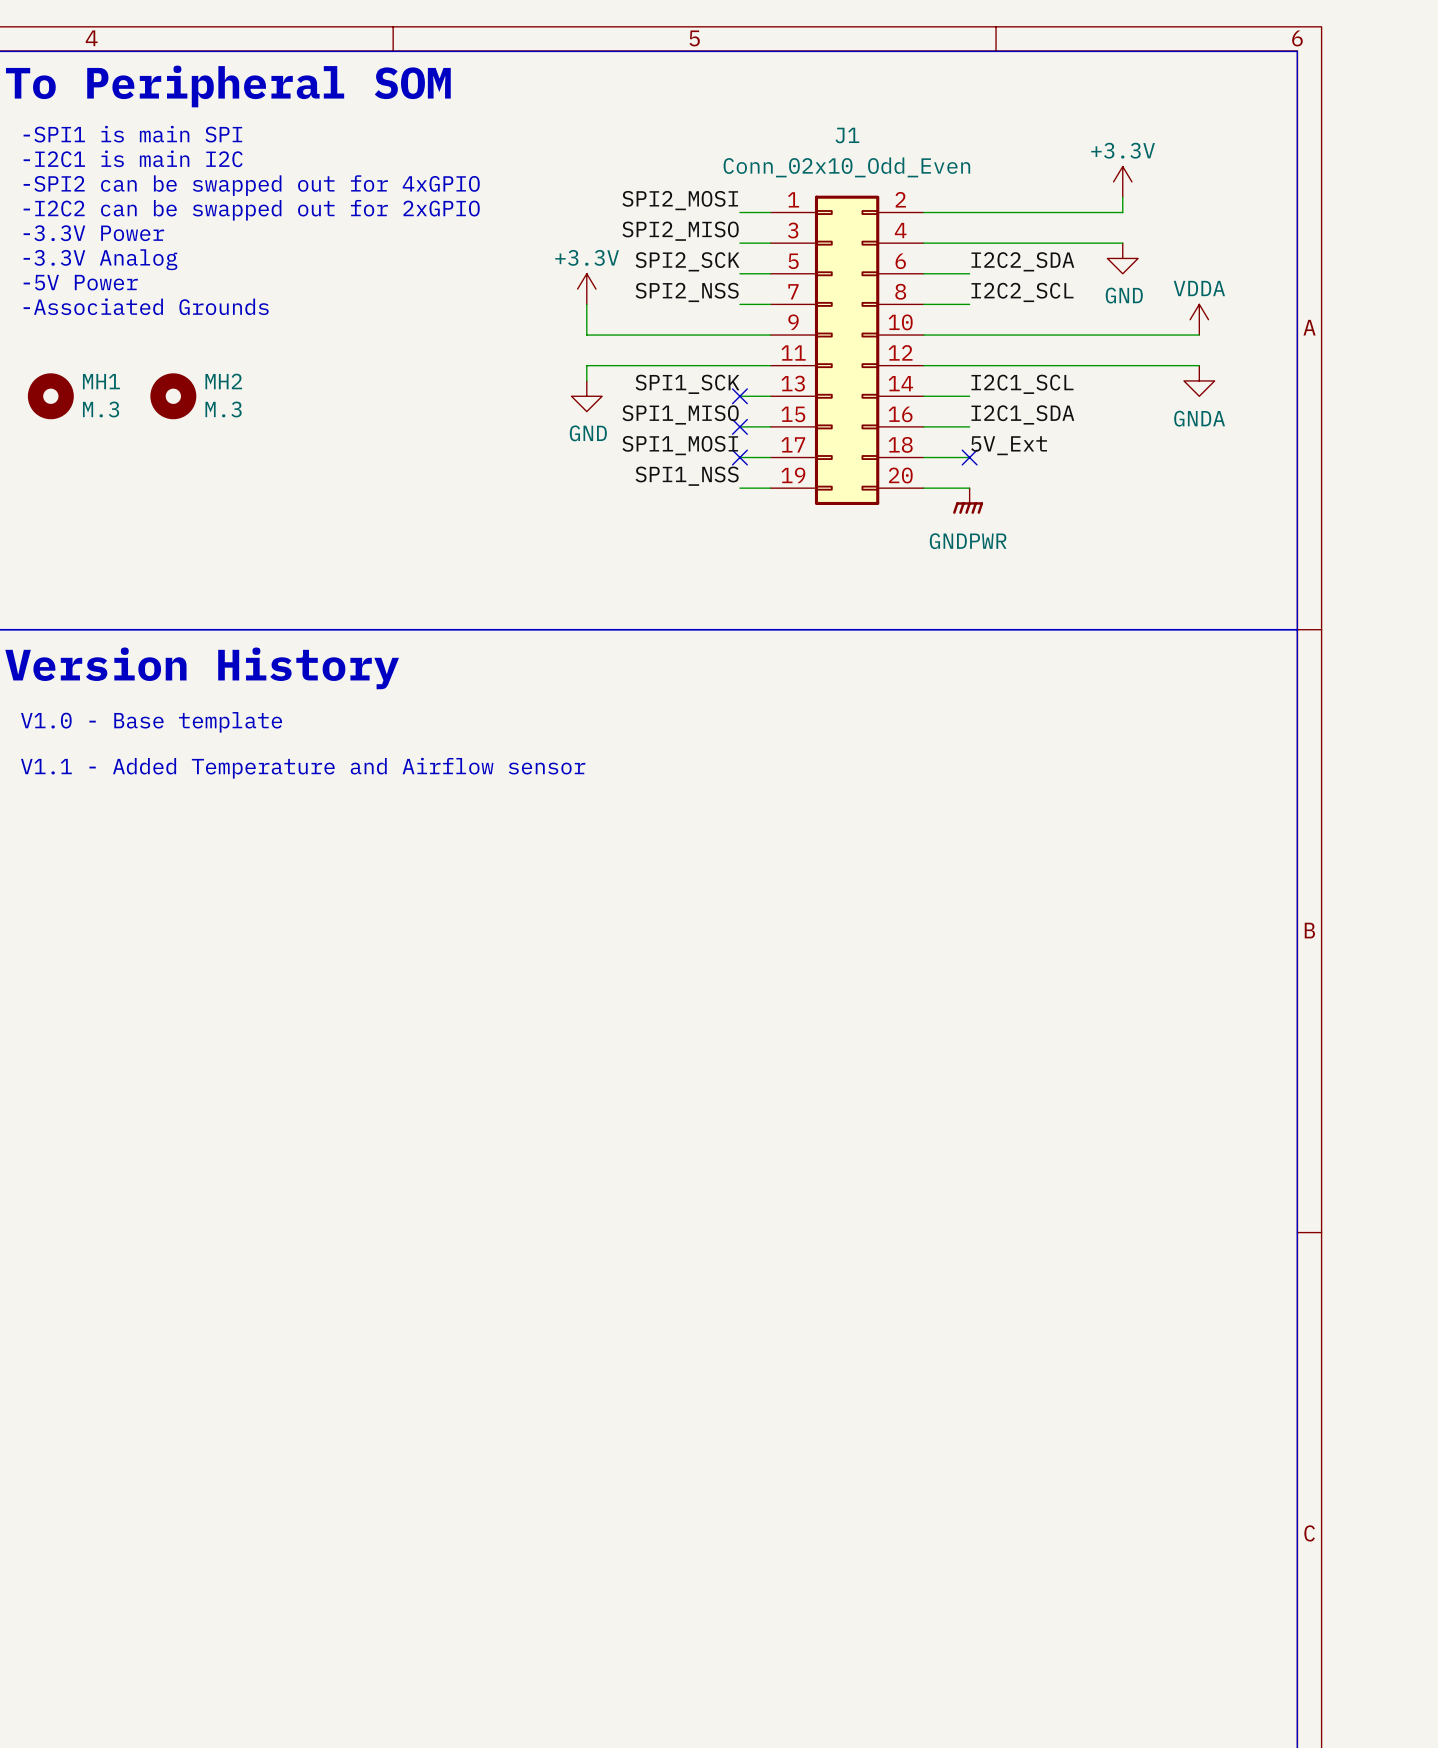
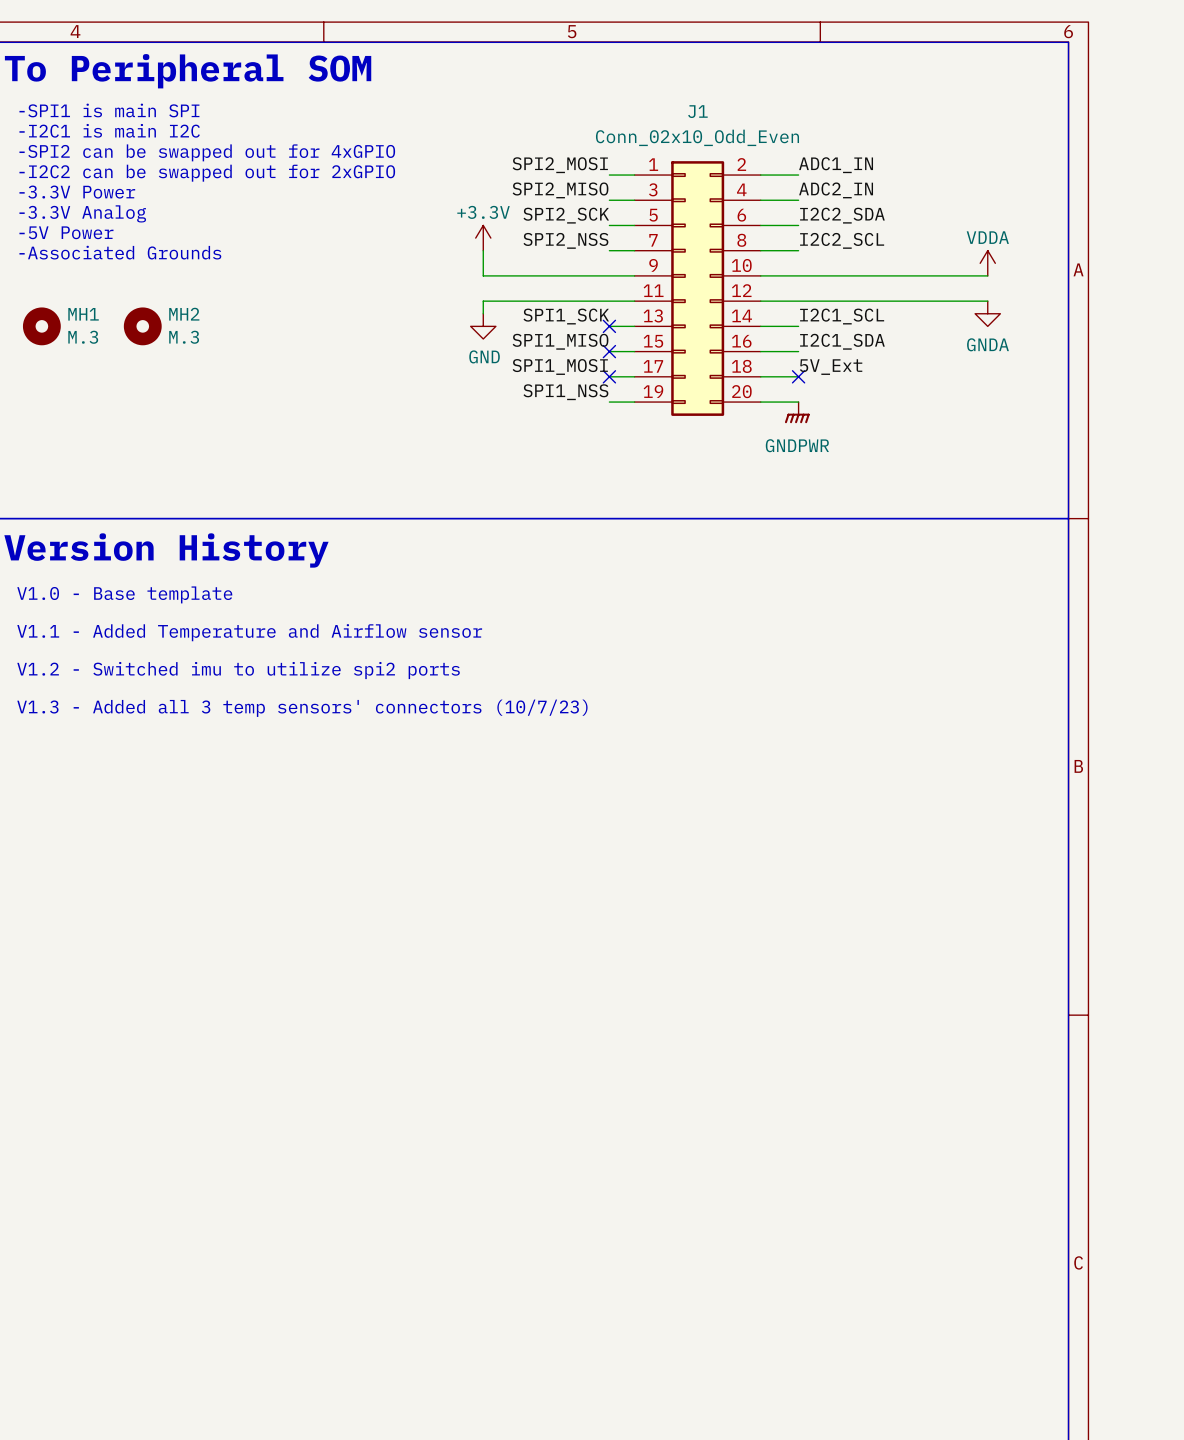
power symbol: +3.3V (1122, 181) -> none
wire: (1122, 197) (1122, 212) (969, 212) -> none
label: none -> ADC1_IN (836, 165)
label: none -> ADC2_IN (836, 190)
wire: (969, 243) (1122, 243) -> none
power symbol: GND (1122, 258) -> none
text: none -> V1.2 - Switched imu to utilize spi2 ports (238, 670)
text: none -> V1.3 - Added all 3 temp sensors' connectors (10/7/23) (302, 708)

